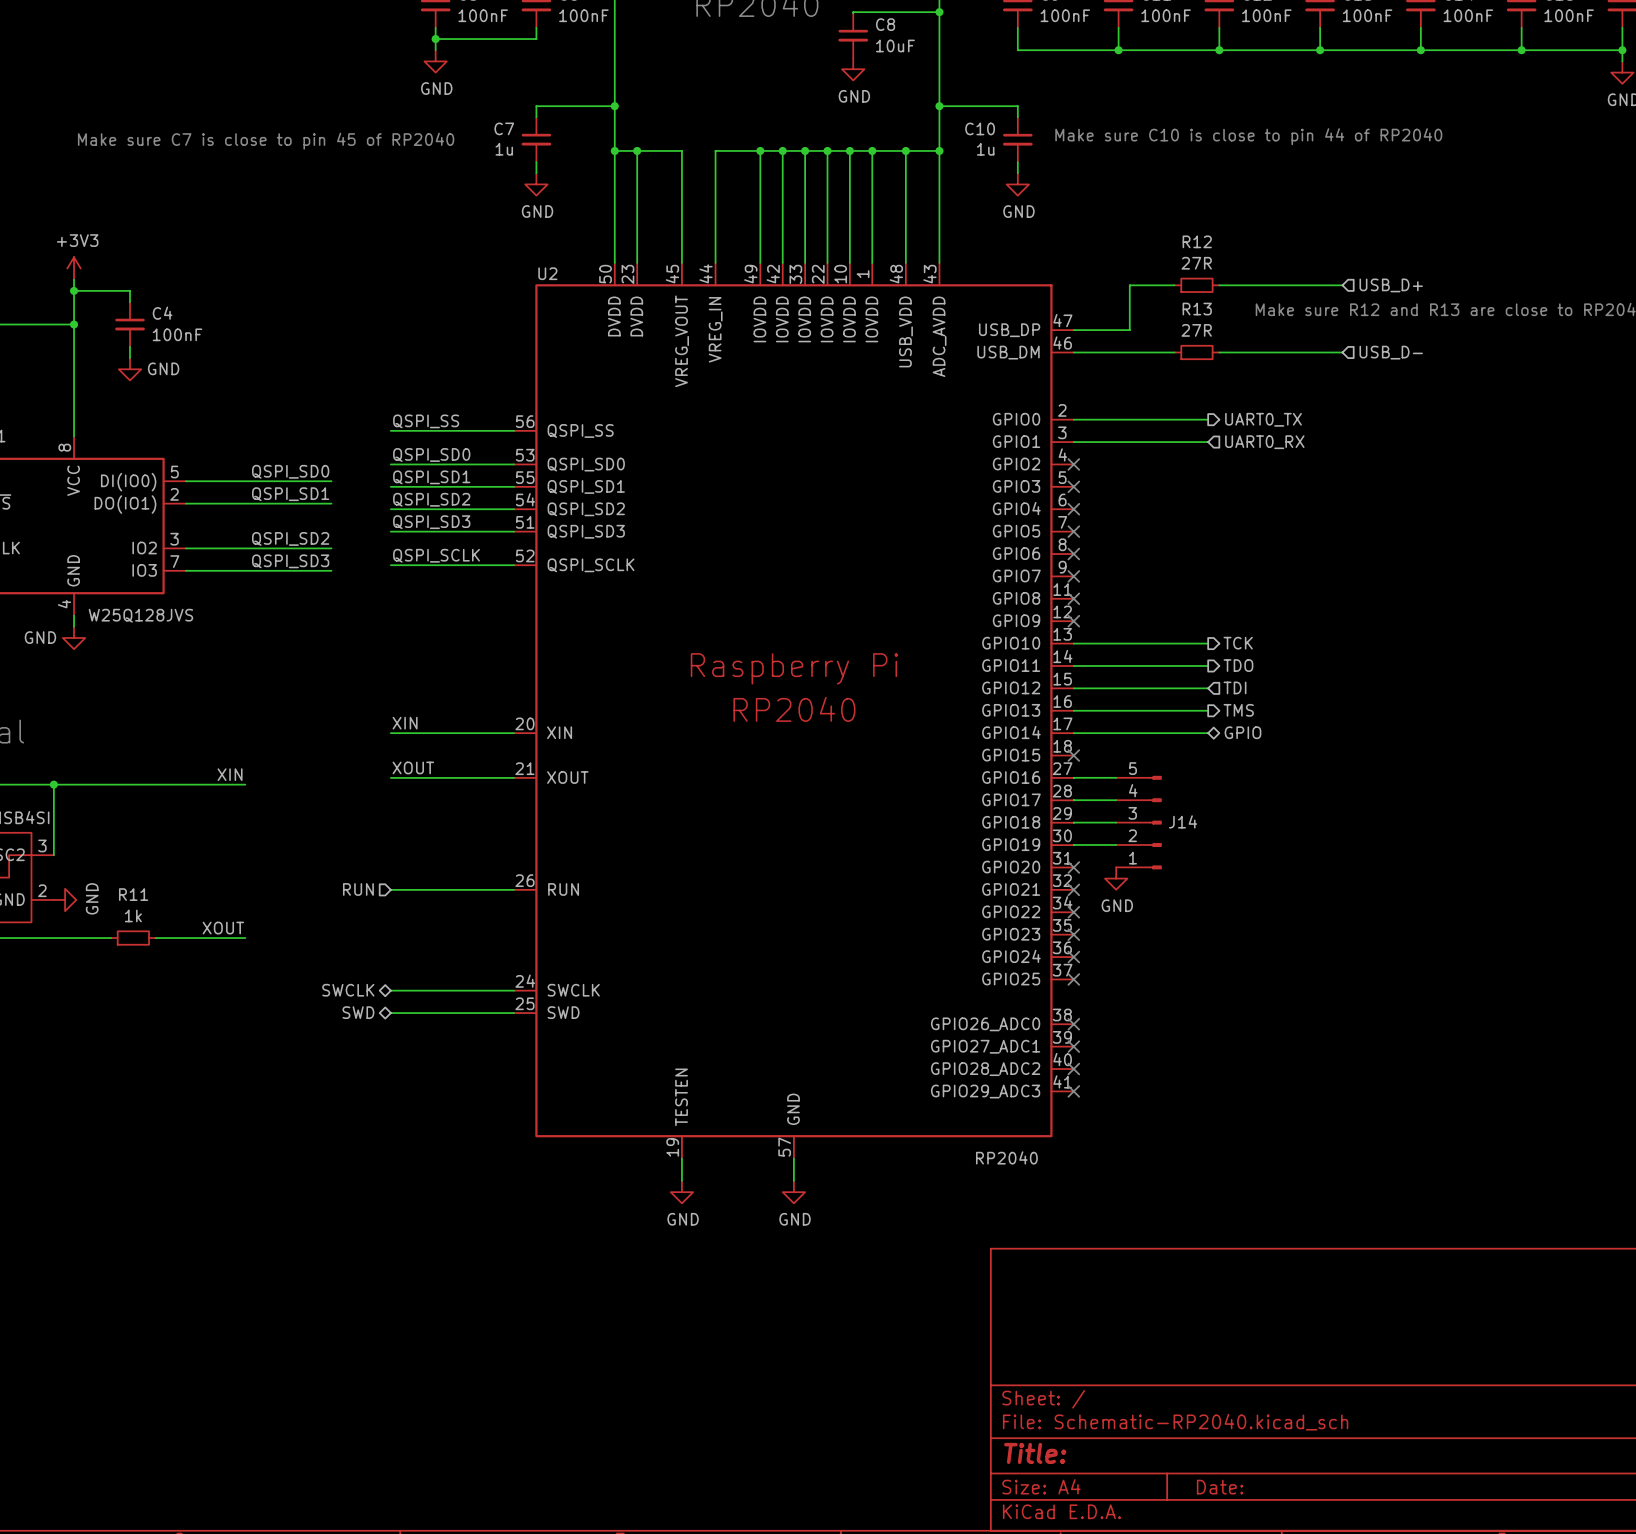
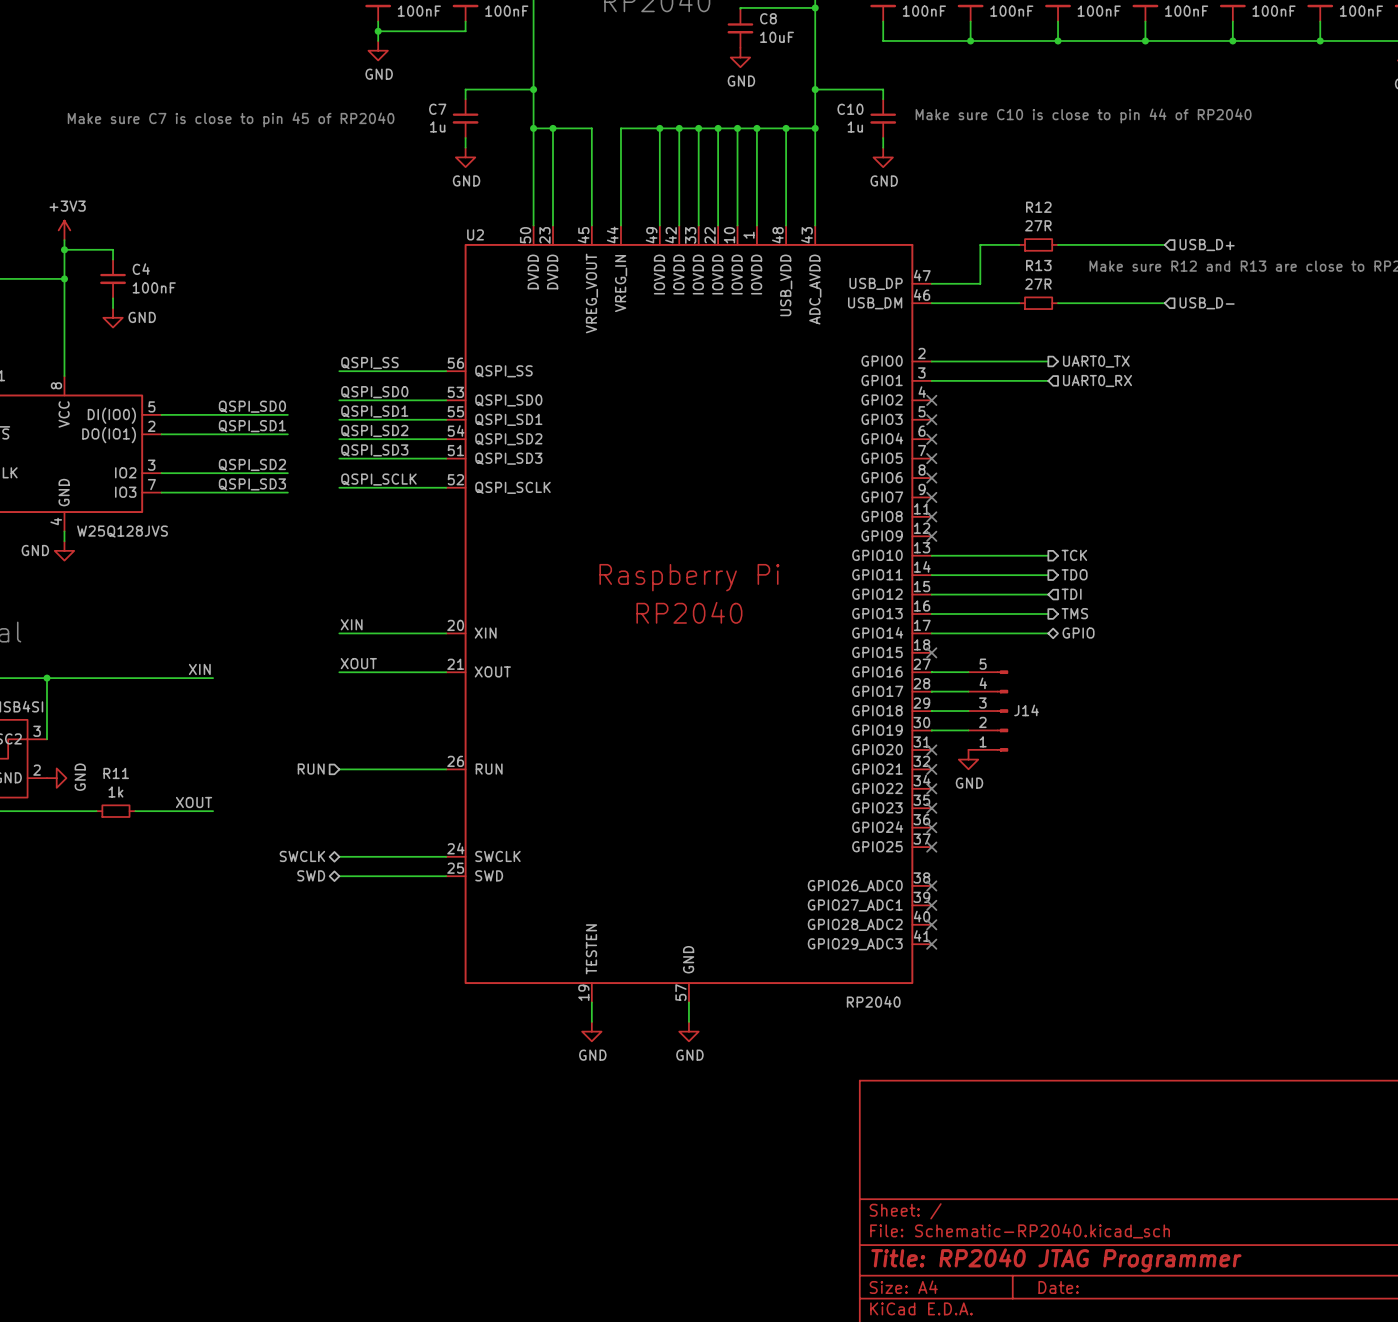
title block: Title: (1035, 1453) -> Title: RP2040 JTAG Programmer (1056, 1260)

